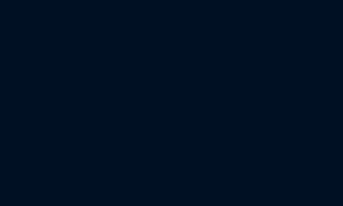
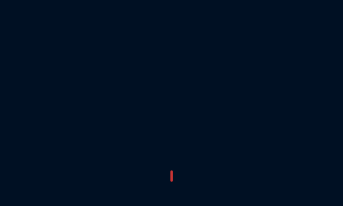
top track: none -> (171, 171) (171, 180)

